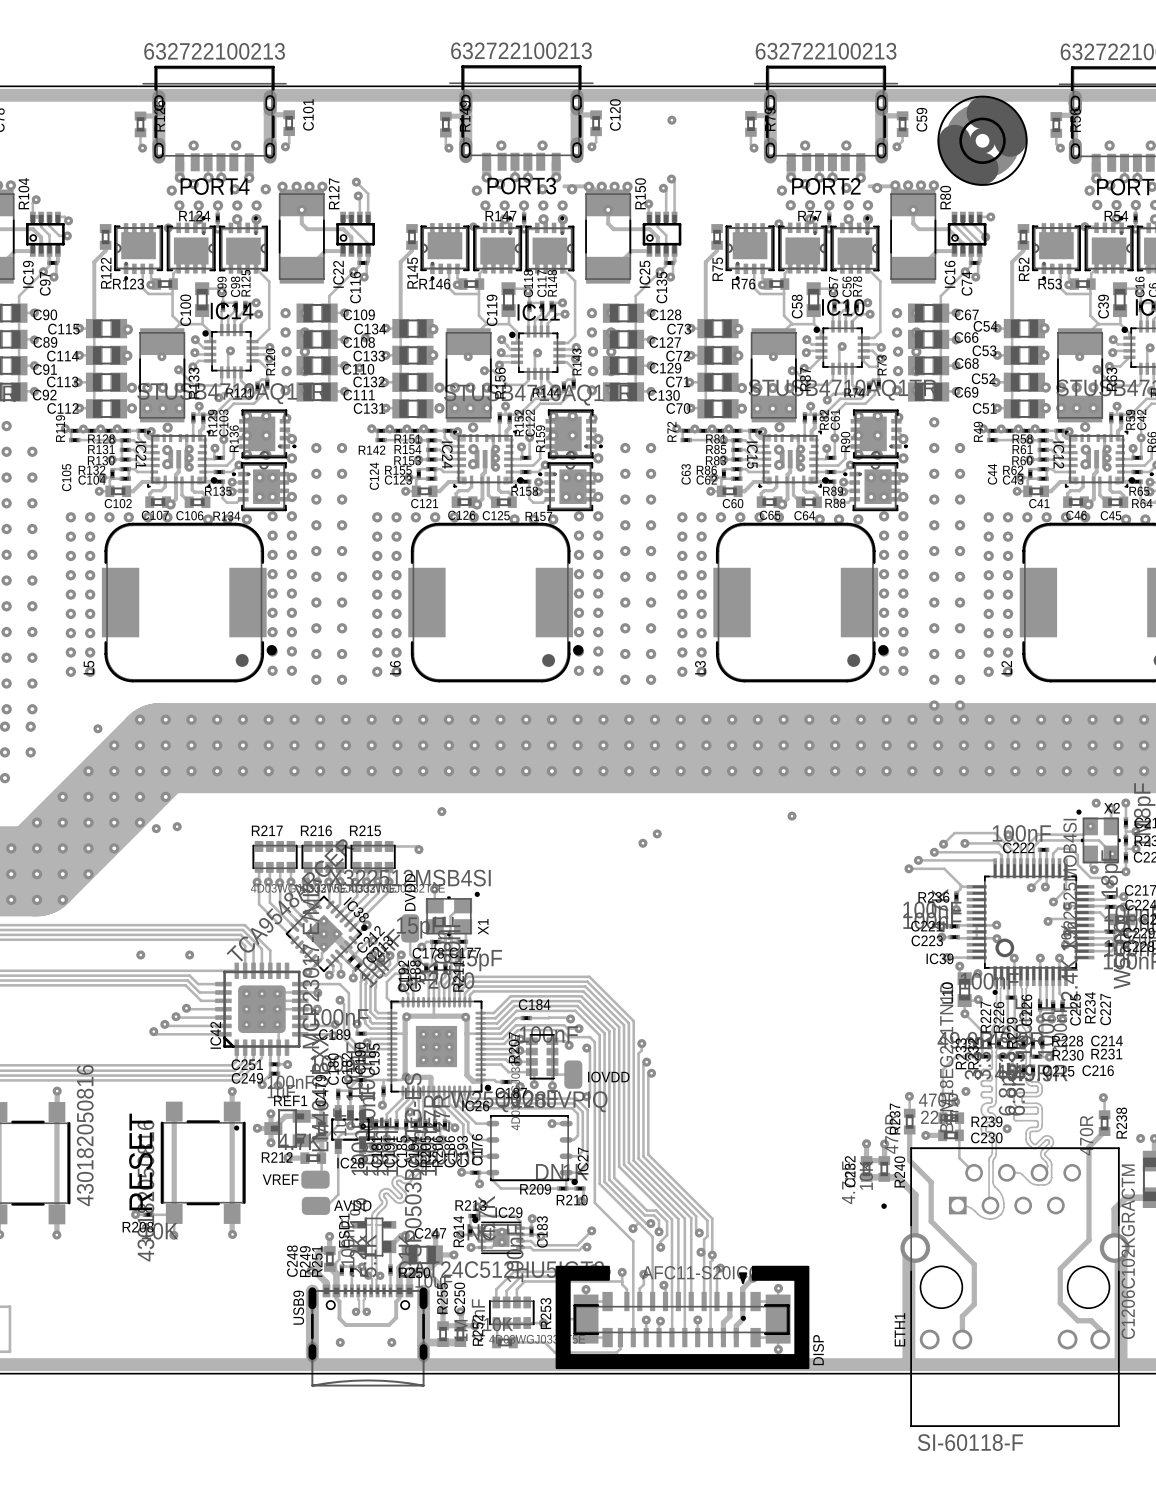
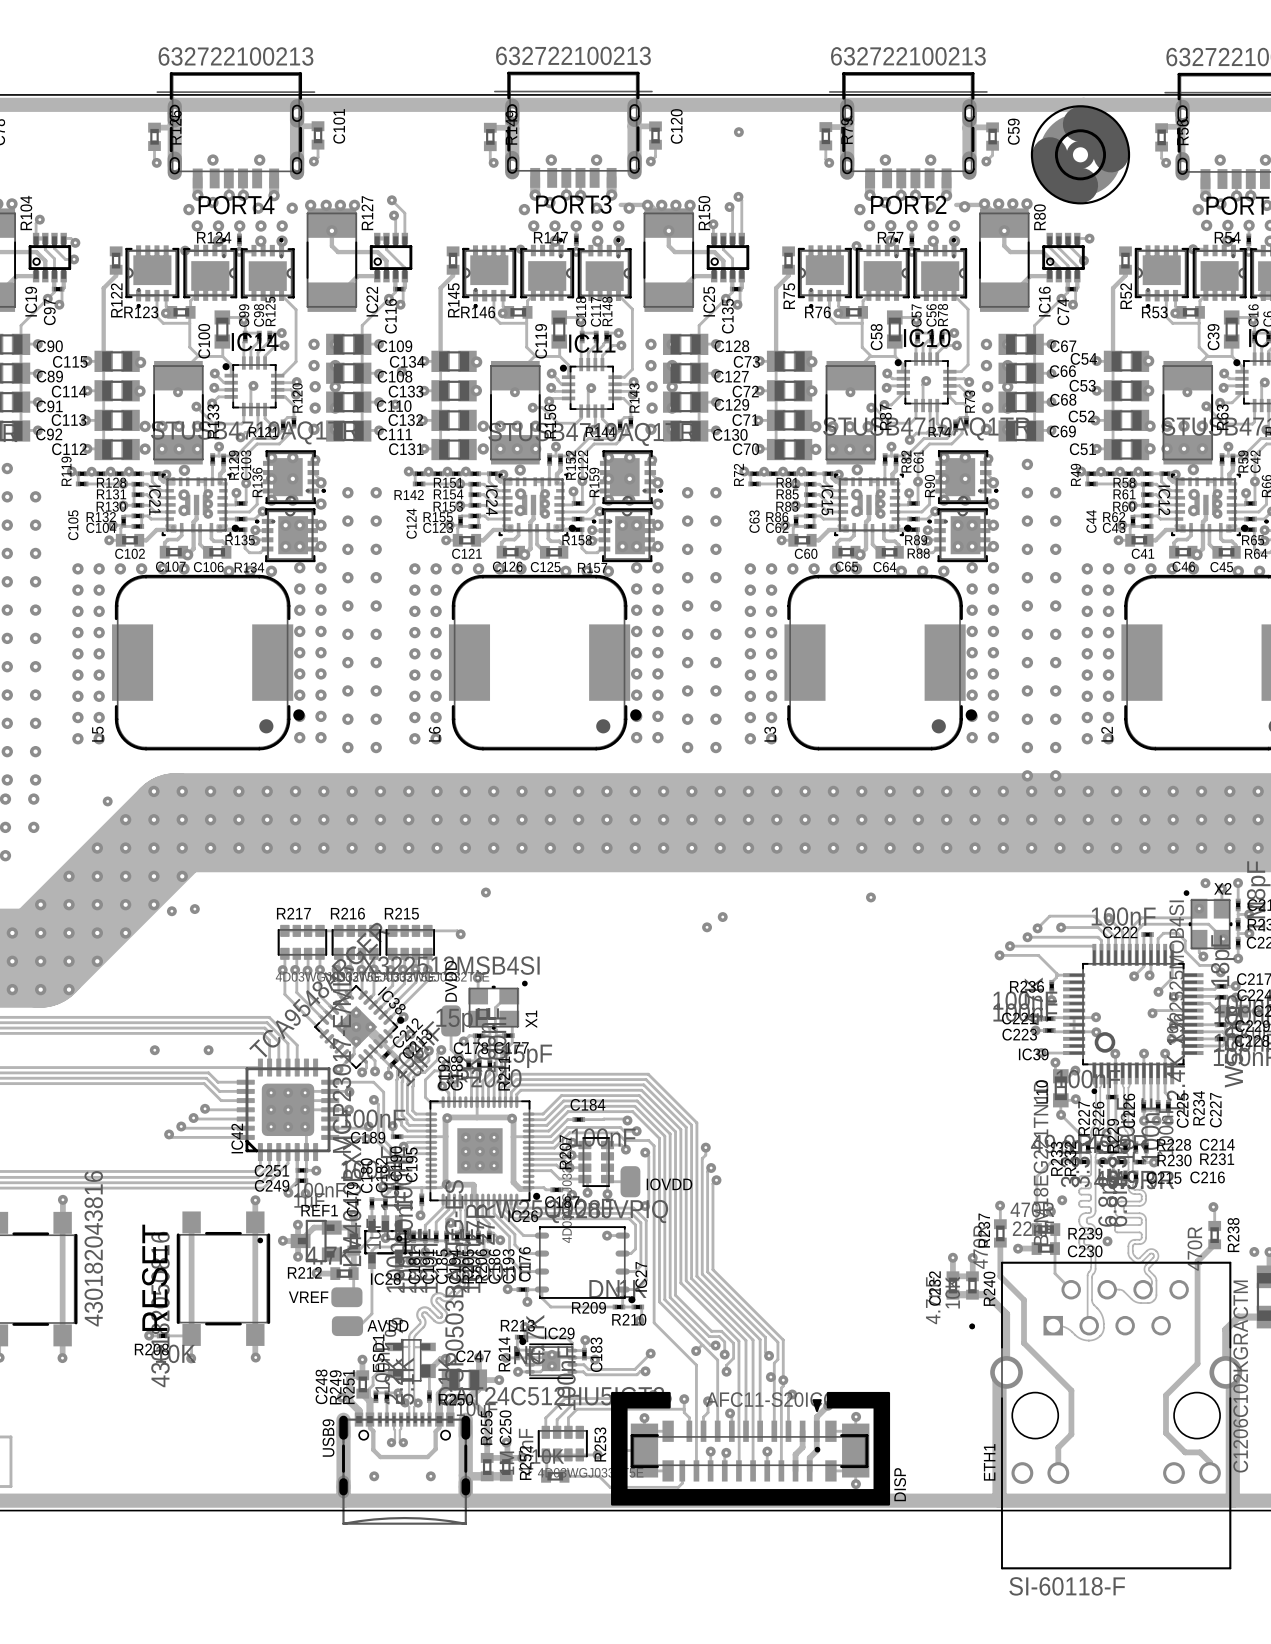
part value: 430182050816 (85, 1135) -> 430182043816 (93, 1248)

